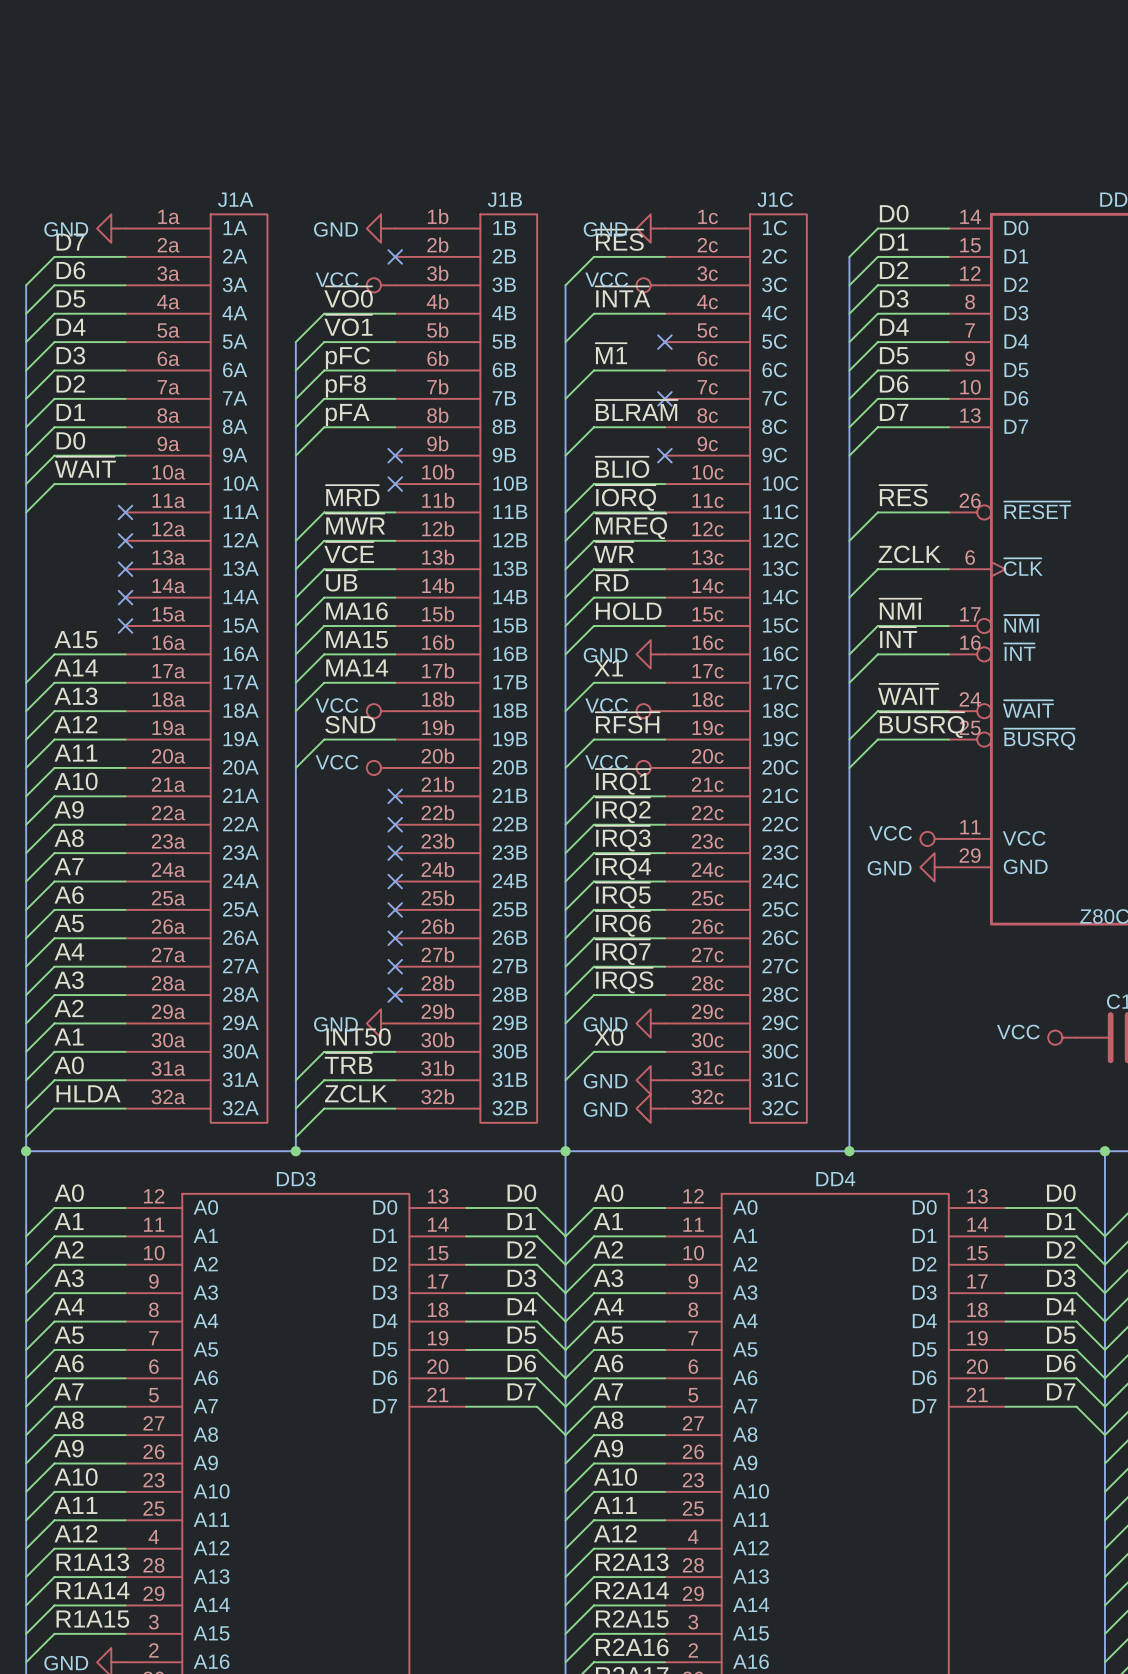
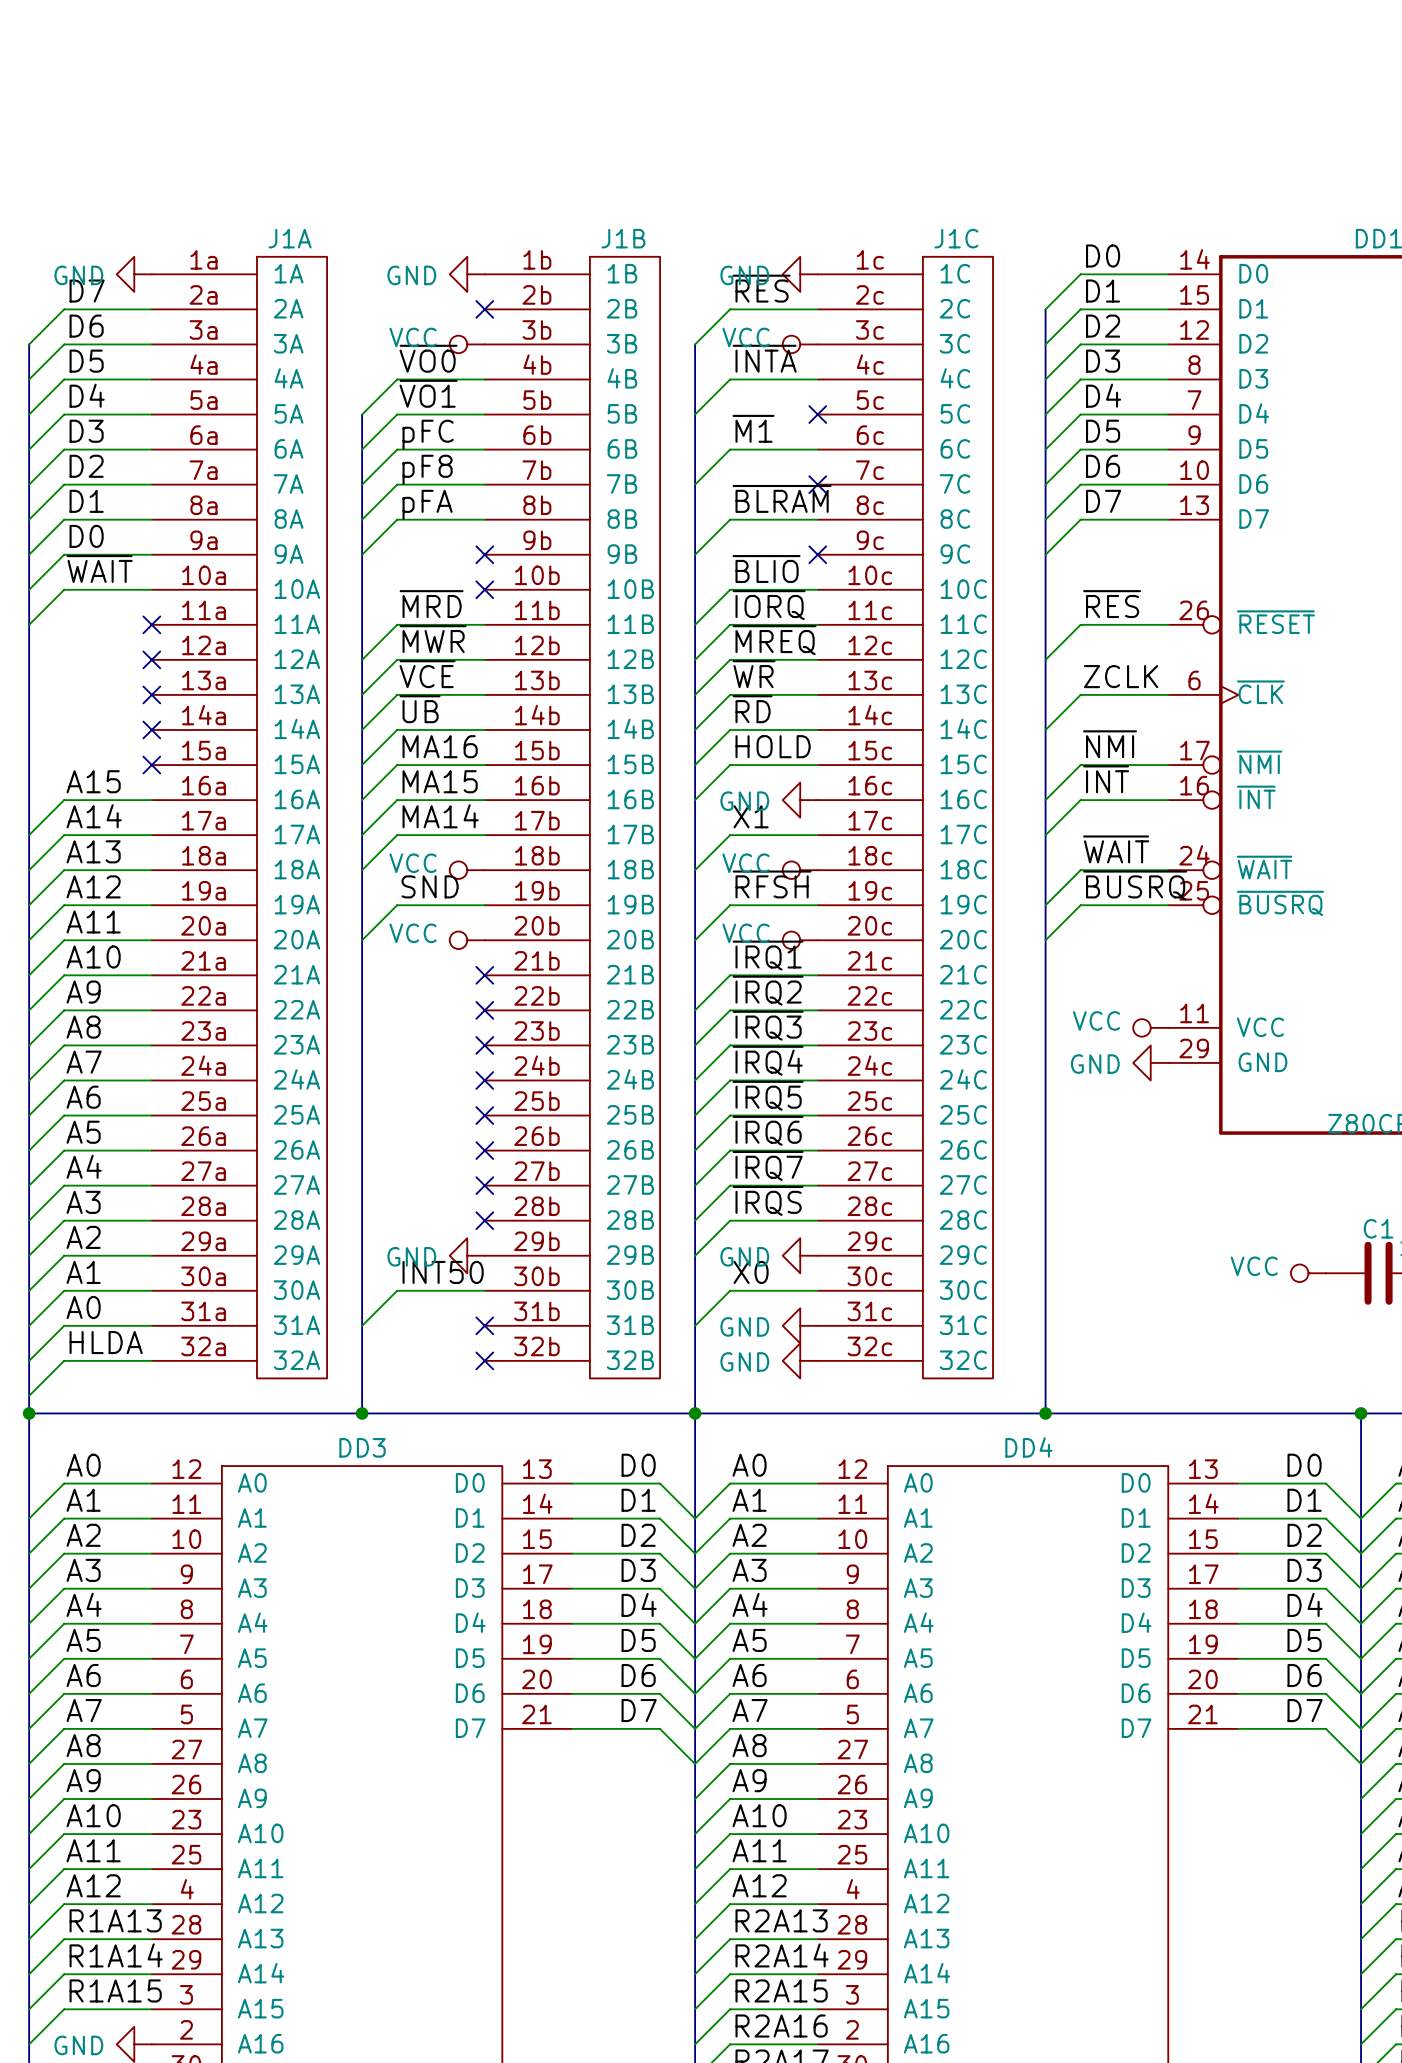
label: ~{TRB} (348, 1063) -> none
wire: (395, 1080) (324, 1080) (295, 1108) -> none
no-connect mark: none -> (484, 1325)
label: ZCLK (356, 1093) -> none
wire: (395, 1108) (324, 1108) (295, 1137) -> none
no-connect mark: none -> (484, 1360)

